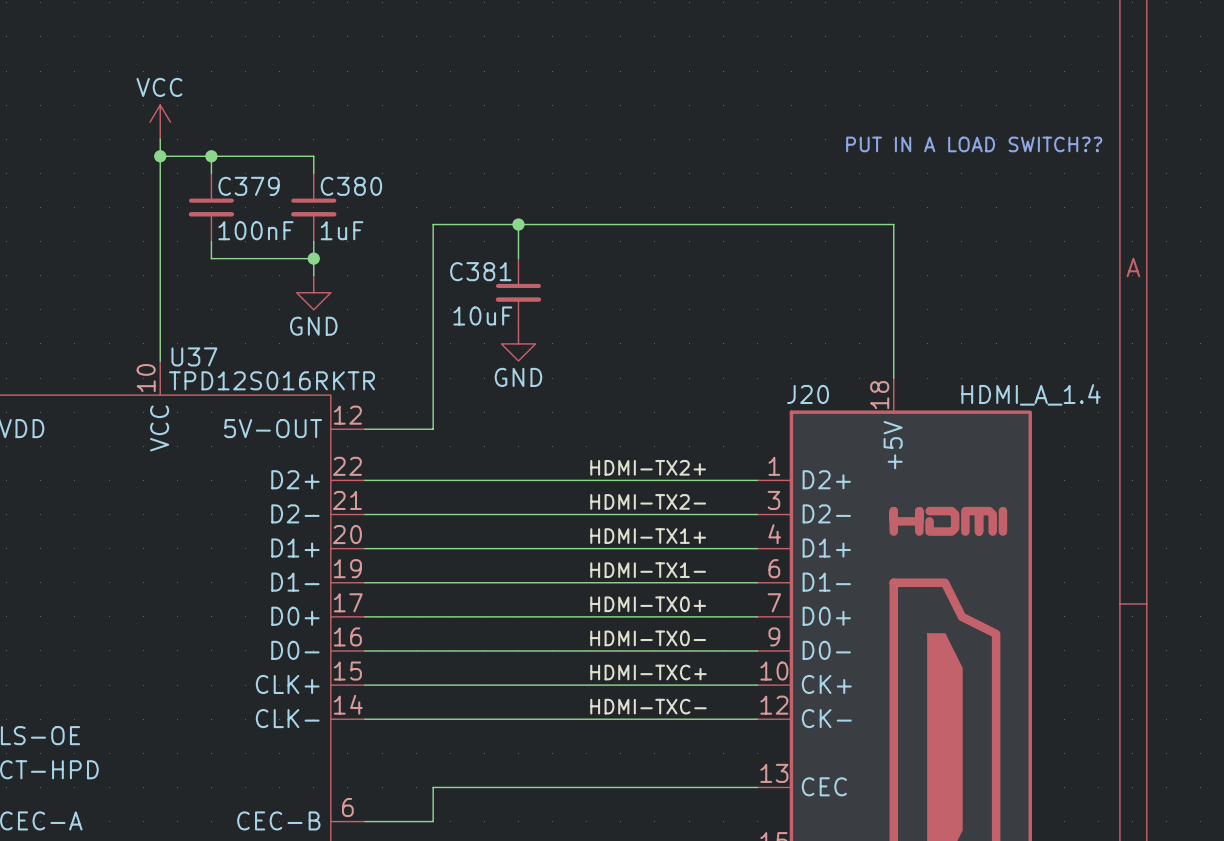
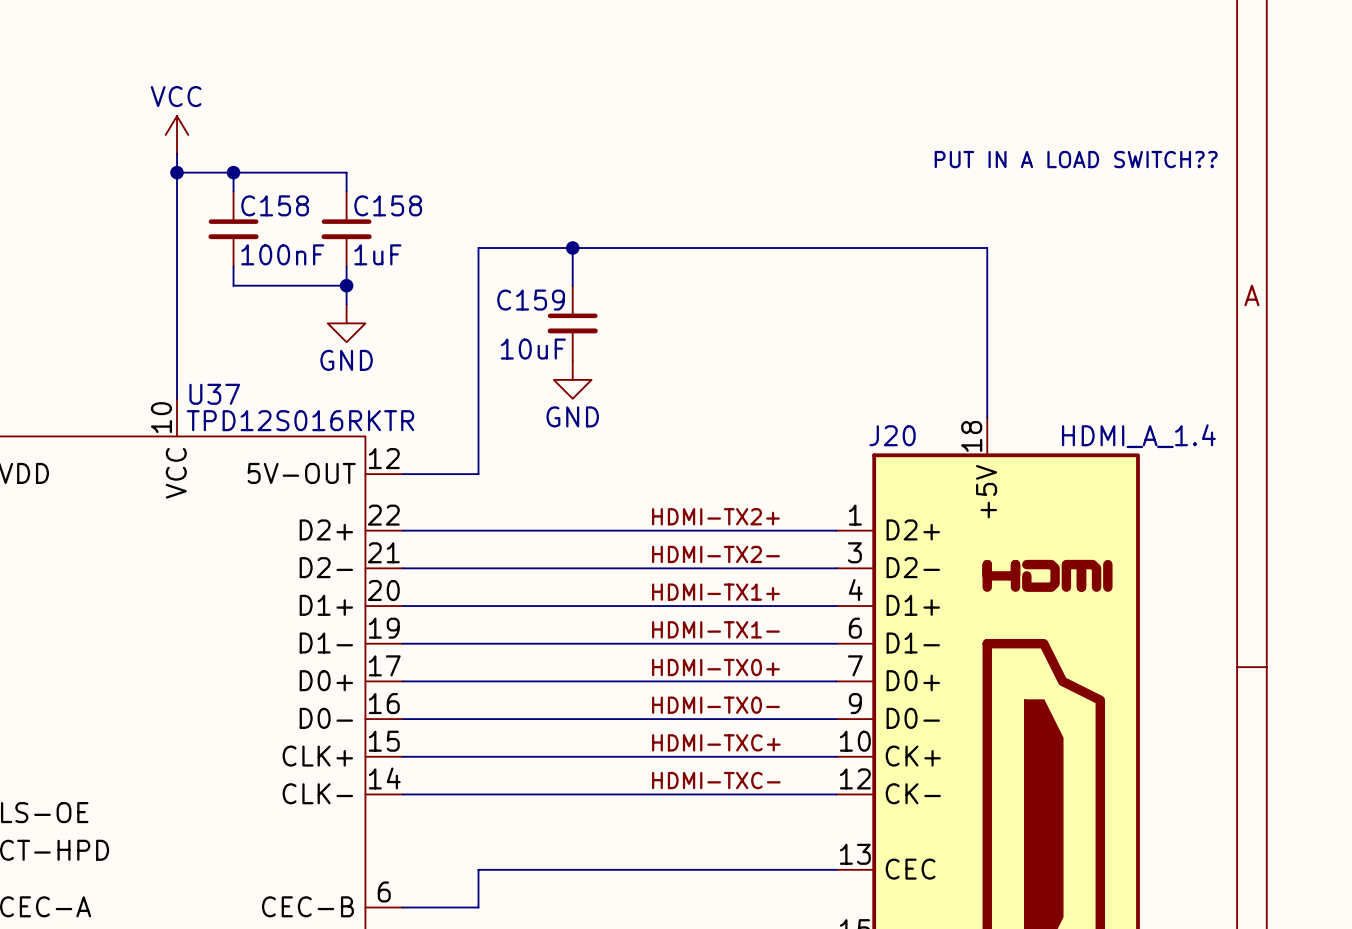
C379 name: C379 (249, 186) -> C158 (275, 205)
C380 name: C380 (351, 186) -> C158 (388, 205)
C381 name: C381 (480, 271) -> C159 (531, 300)

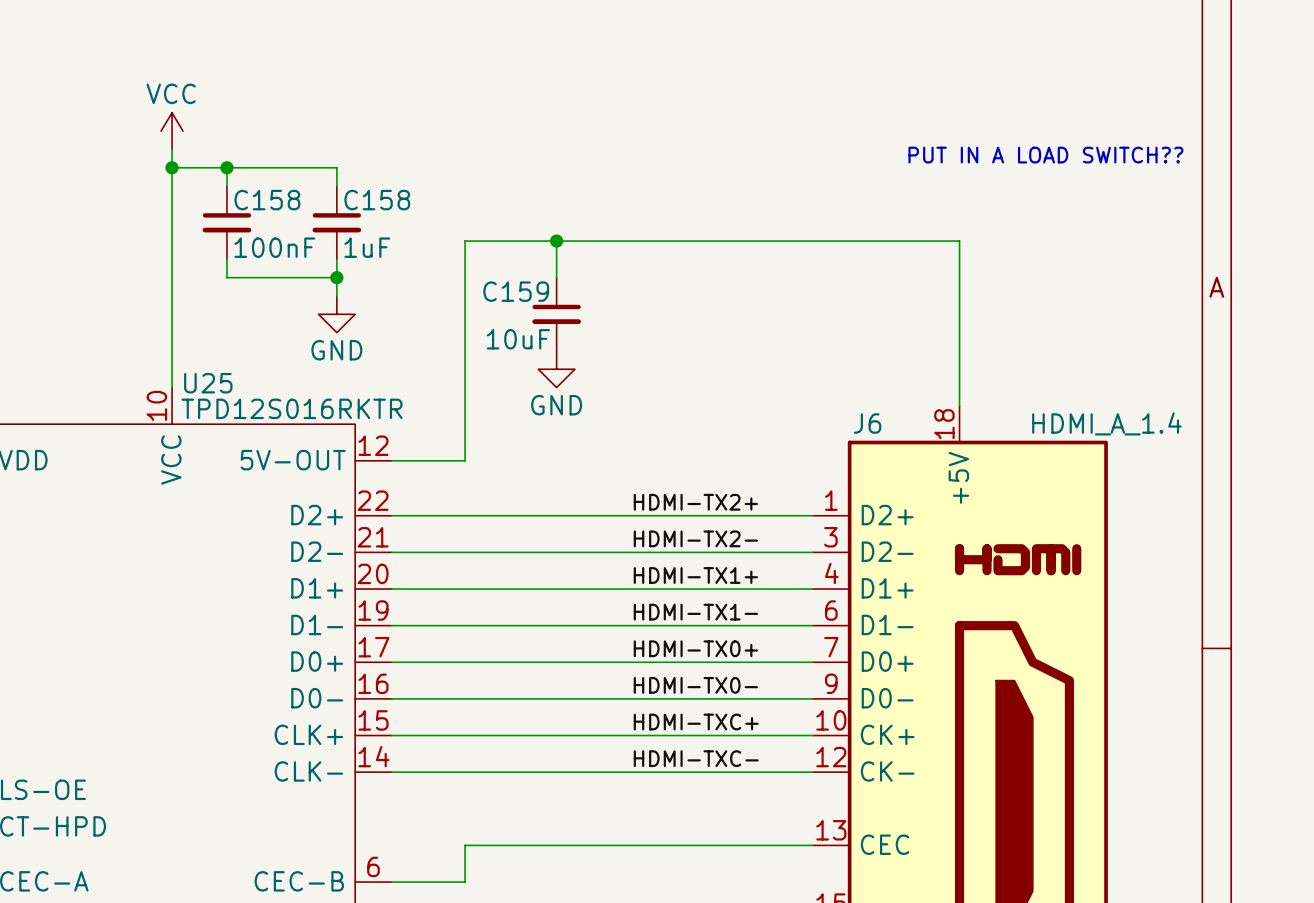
U37 name: U37 (214, 394) -> U25 (208, 383)
J20 name: J20 (892, 435) -> J6 (867, 423)

